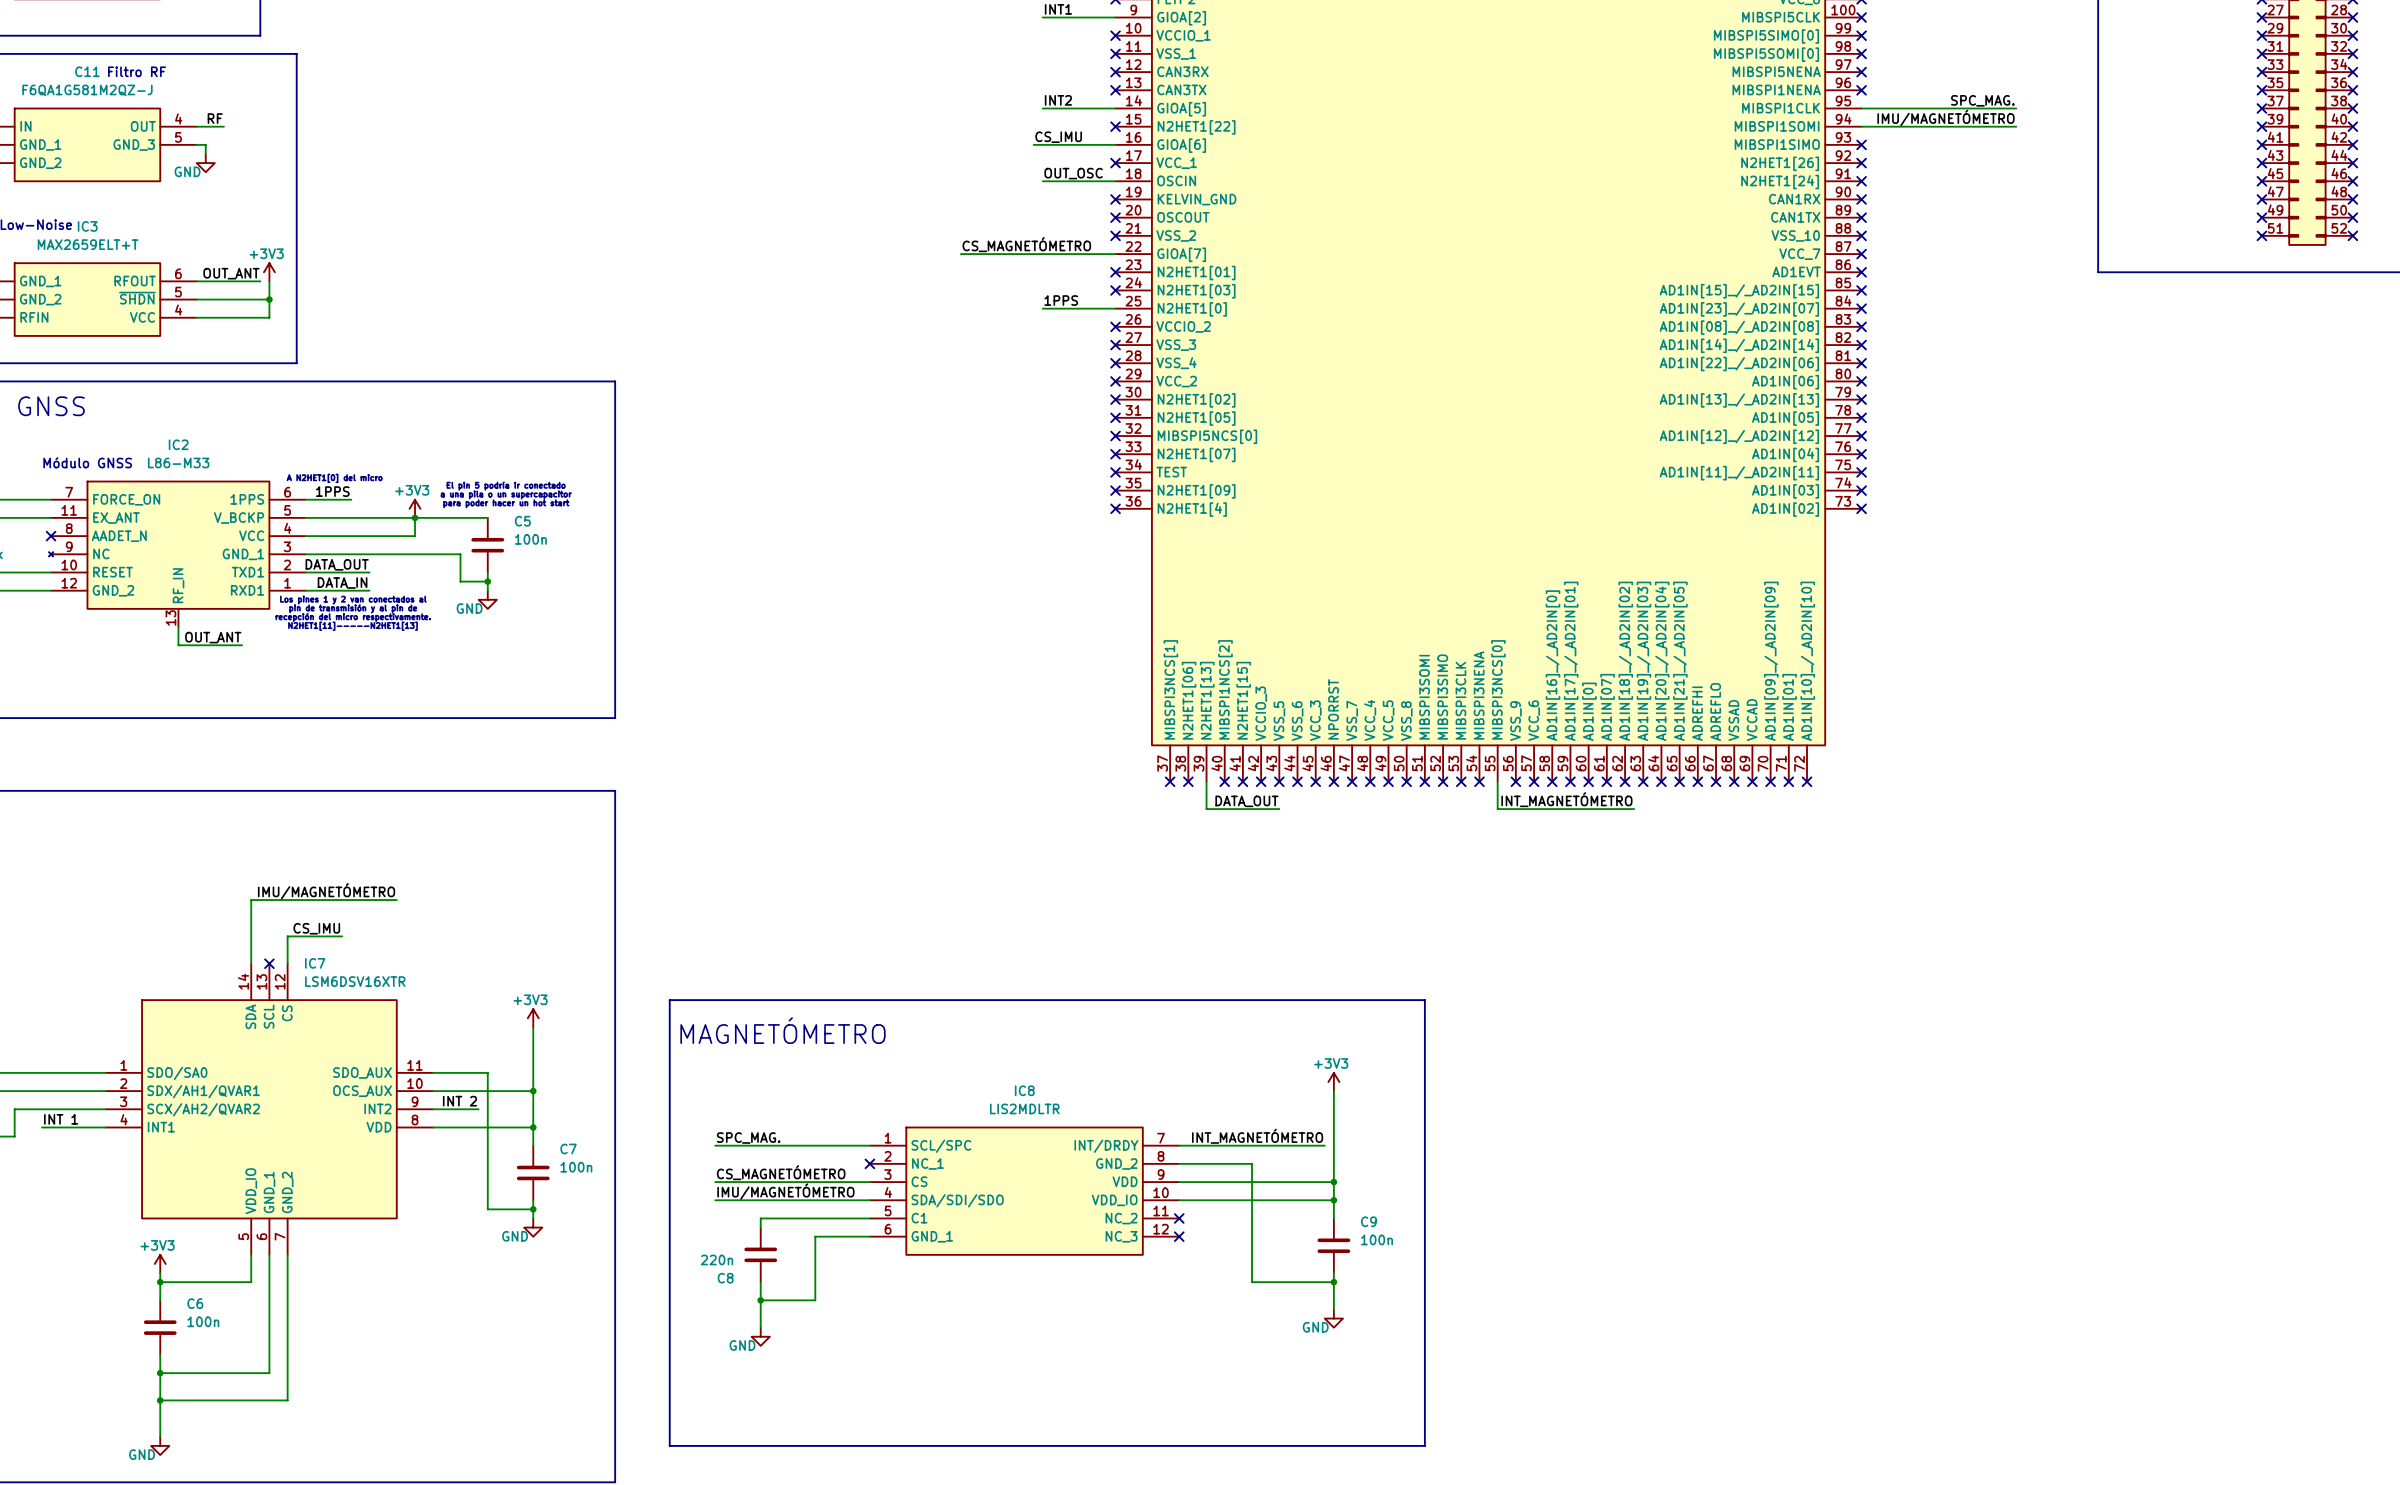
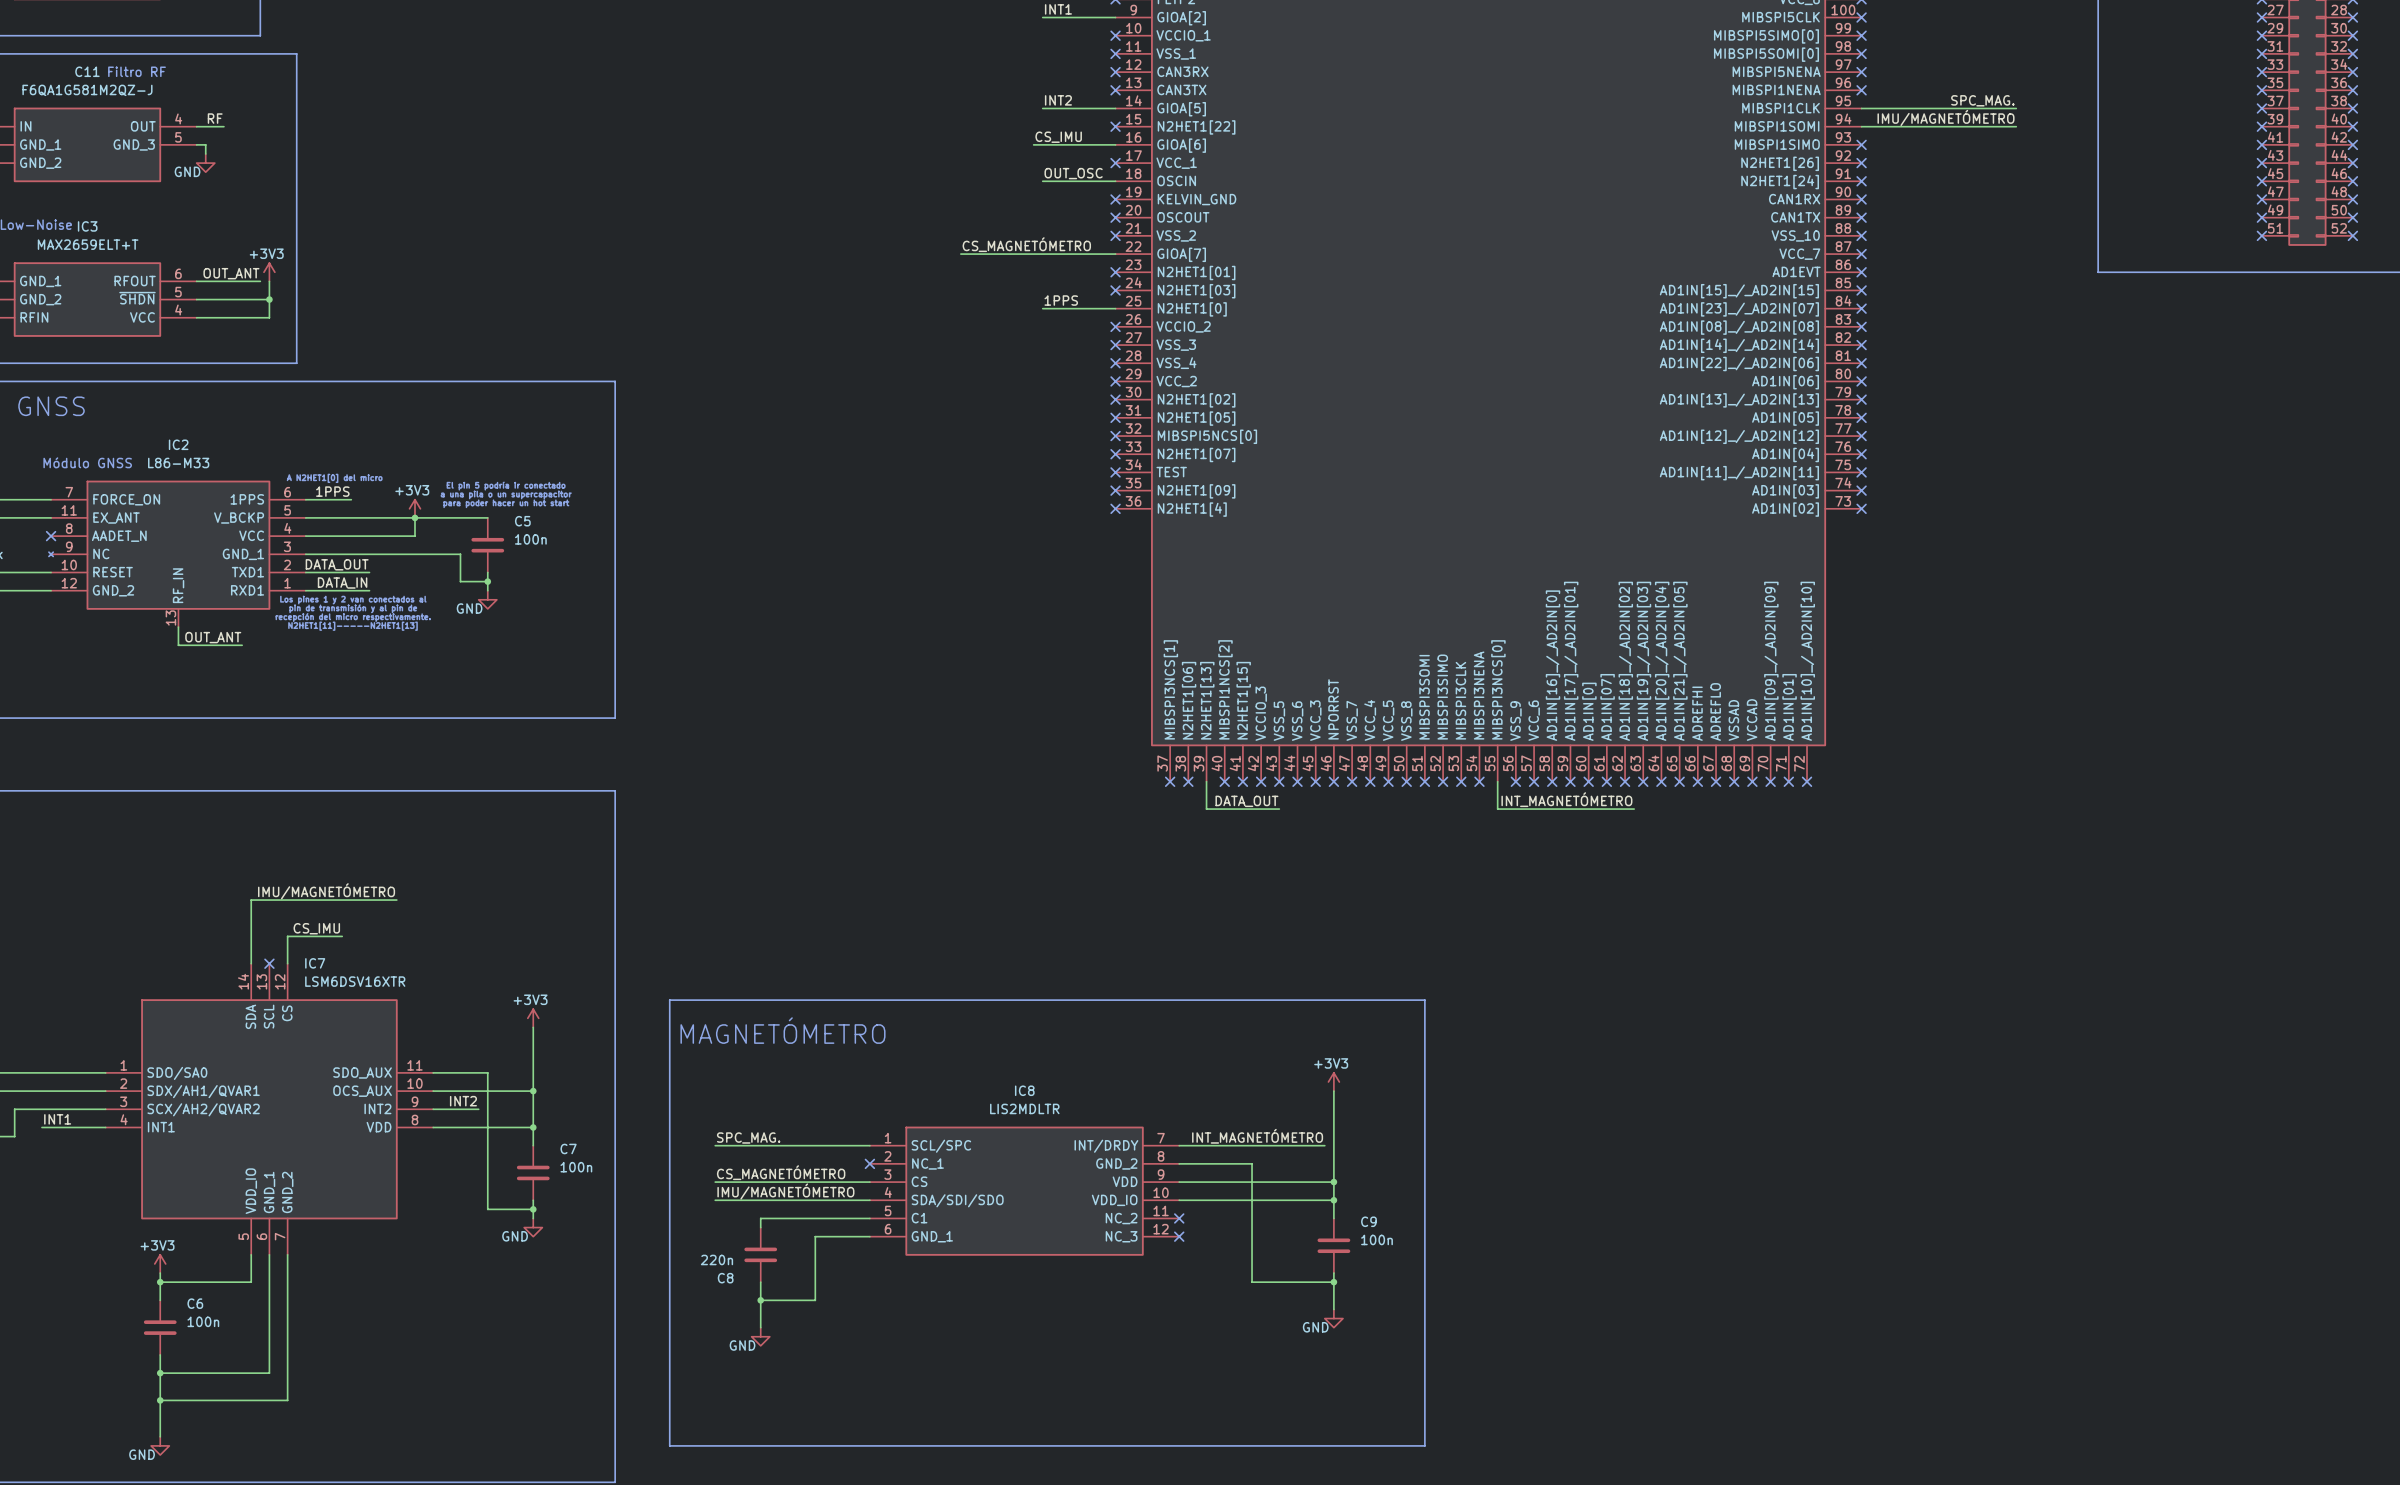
label: INT 2 (459, 1101) -> INT2 (463, 1101)
label: INT 1 (61, 1119) -> INT1 (57, 1119)

